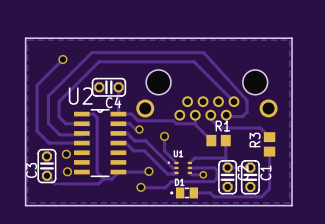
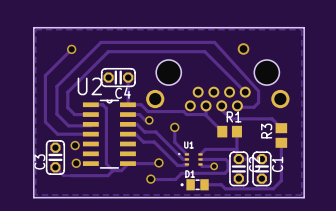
via: none -> (243, 48)

